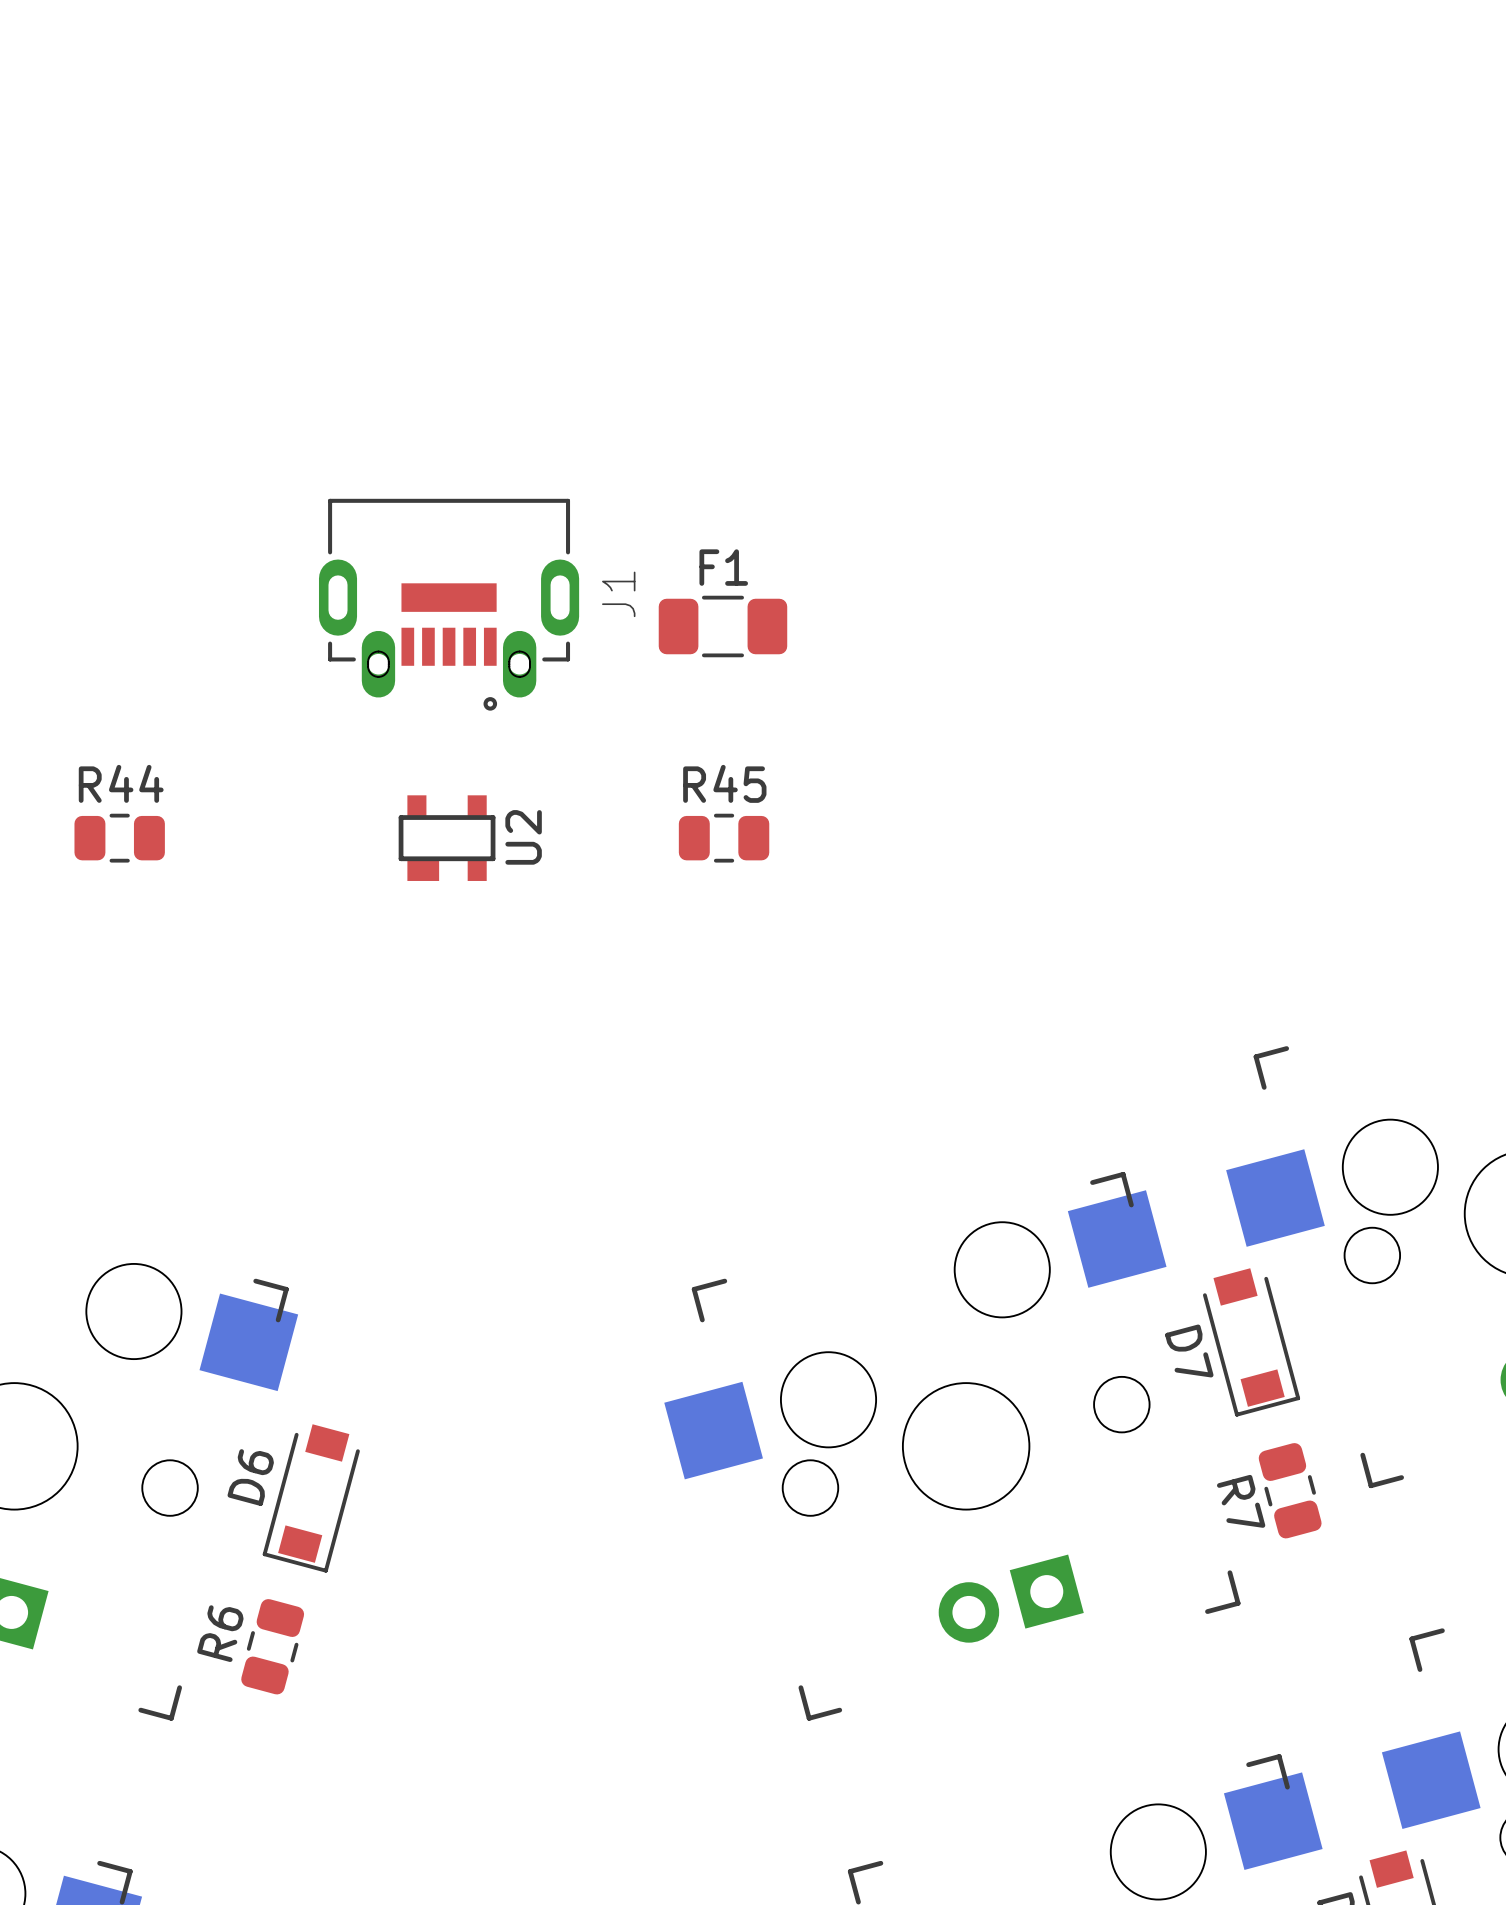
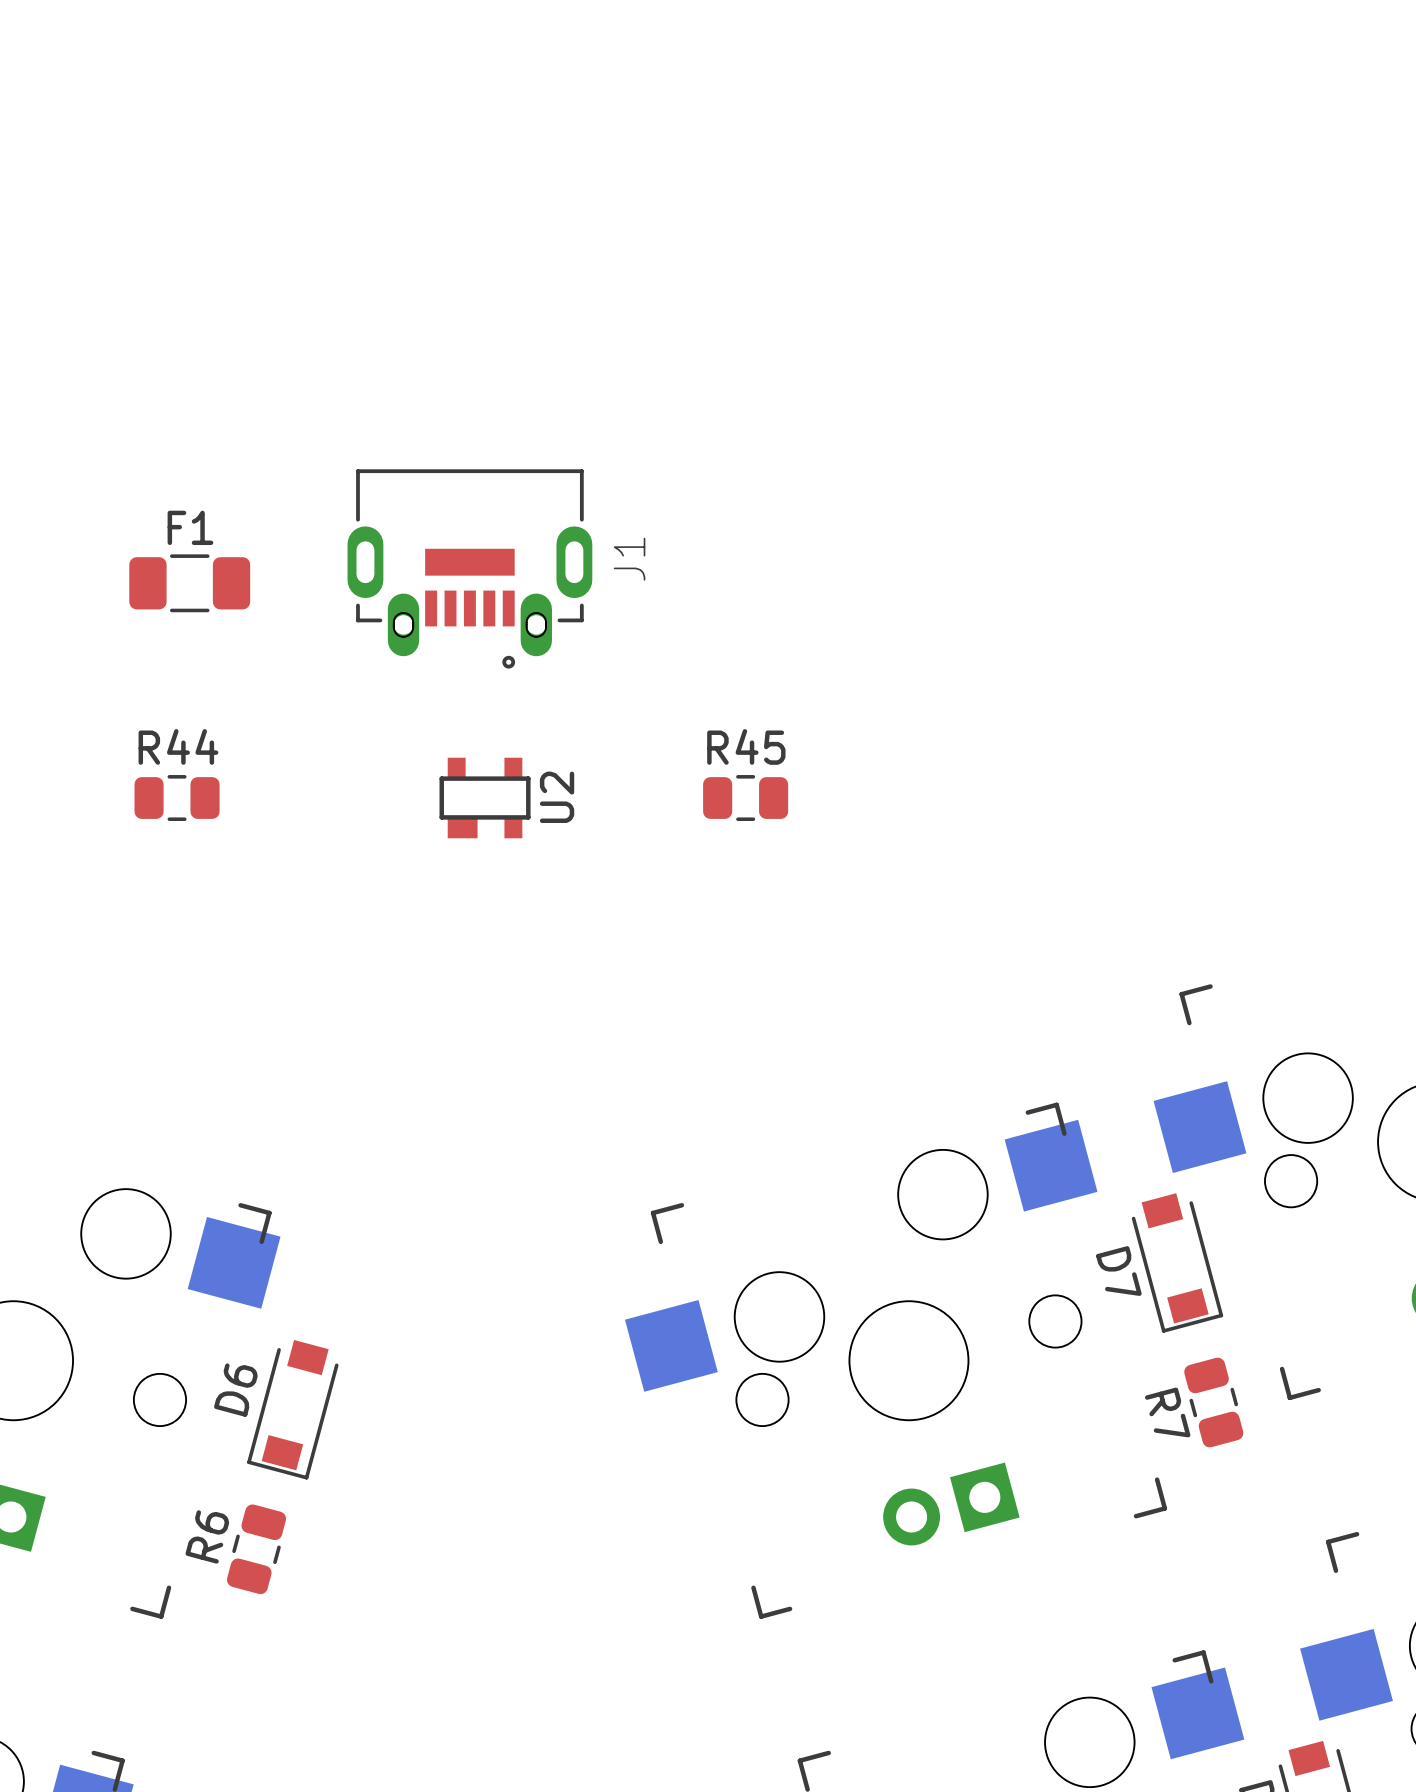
J1 position: (449, 604) -> (469, 568)
F1 position: (722, 626) -> (189, 583)
R44 position: (119, 838) -> (177, 798)
U2 position: (447, 838) -> (485, 798)
R45 position: (724, 838) -> (745, 798)

